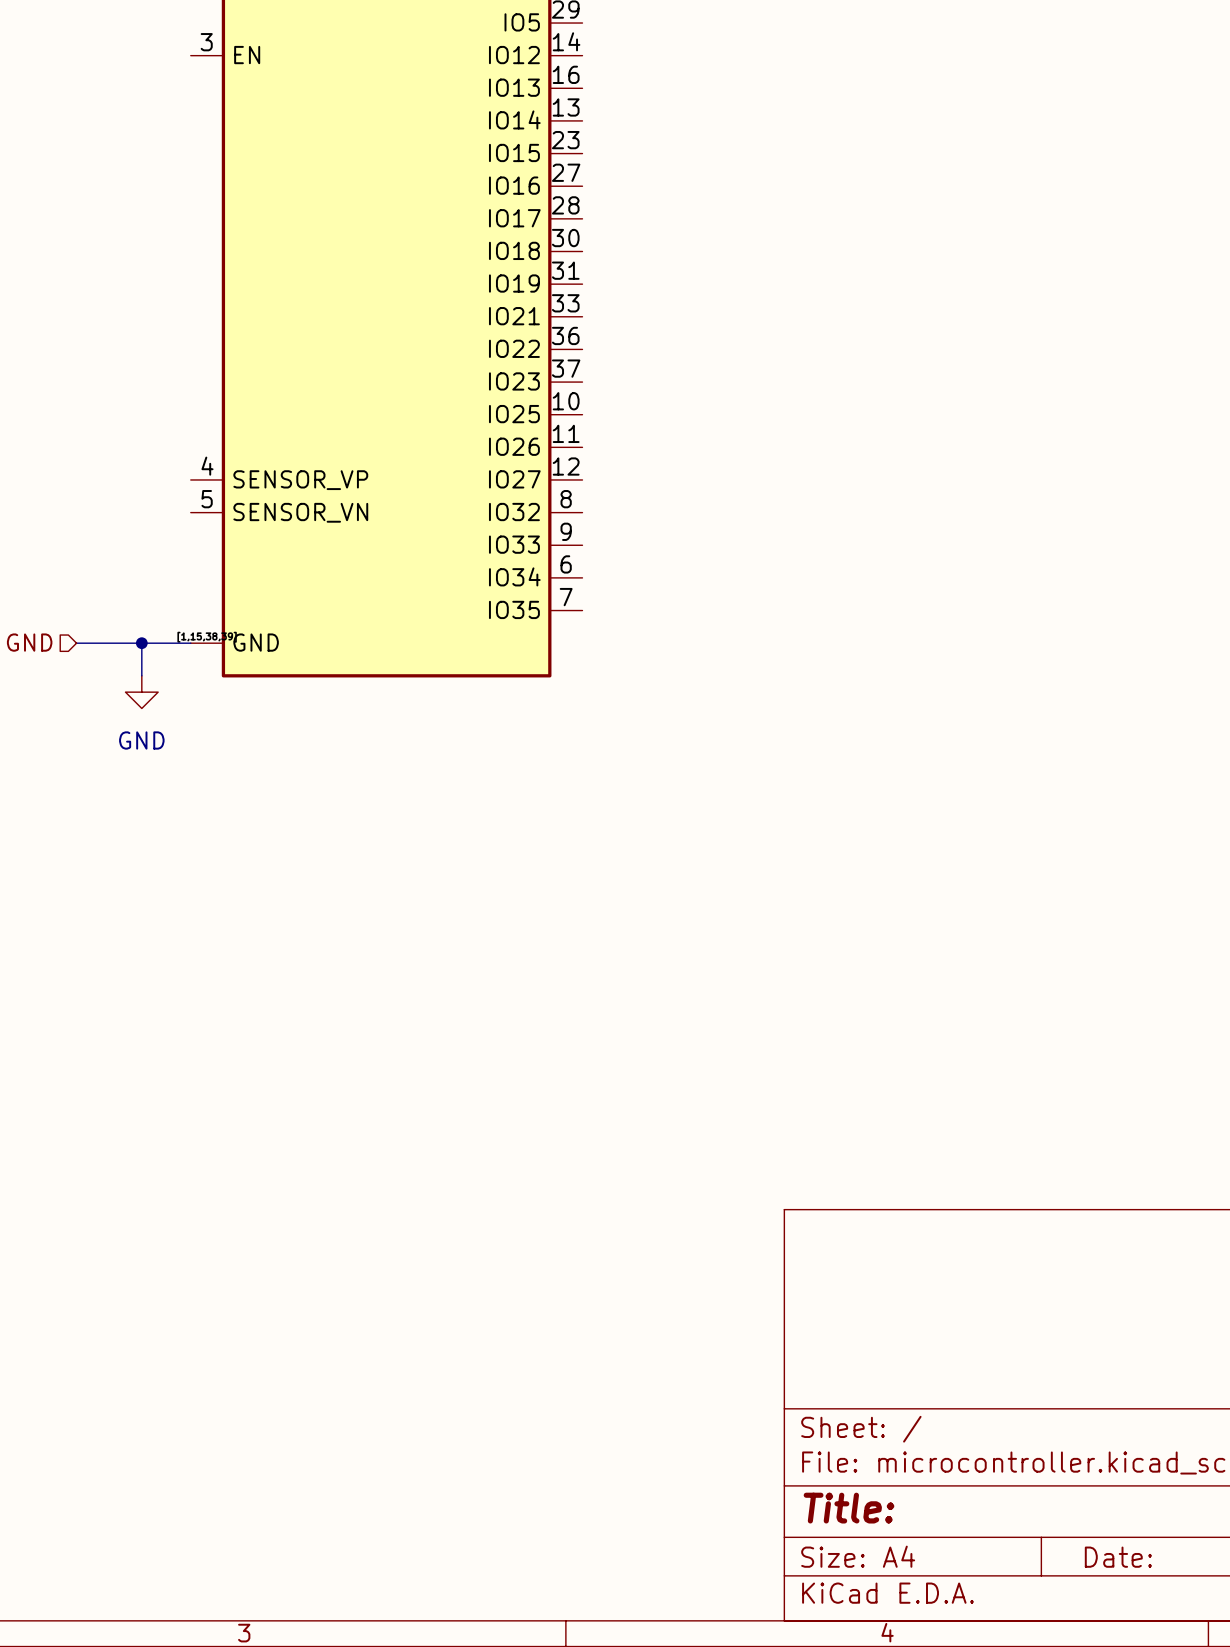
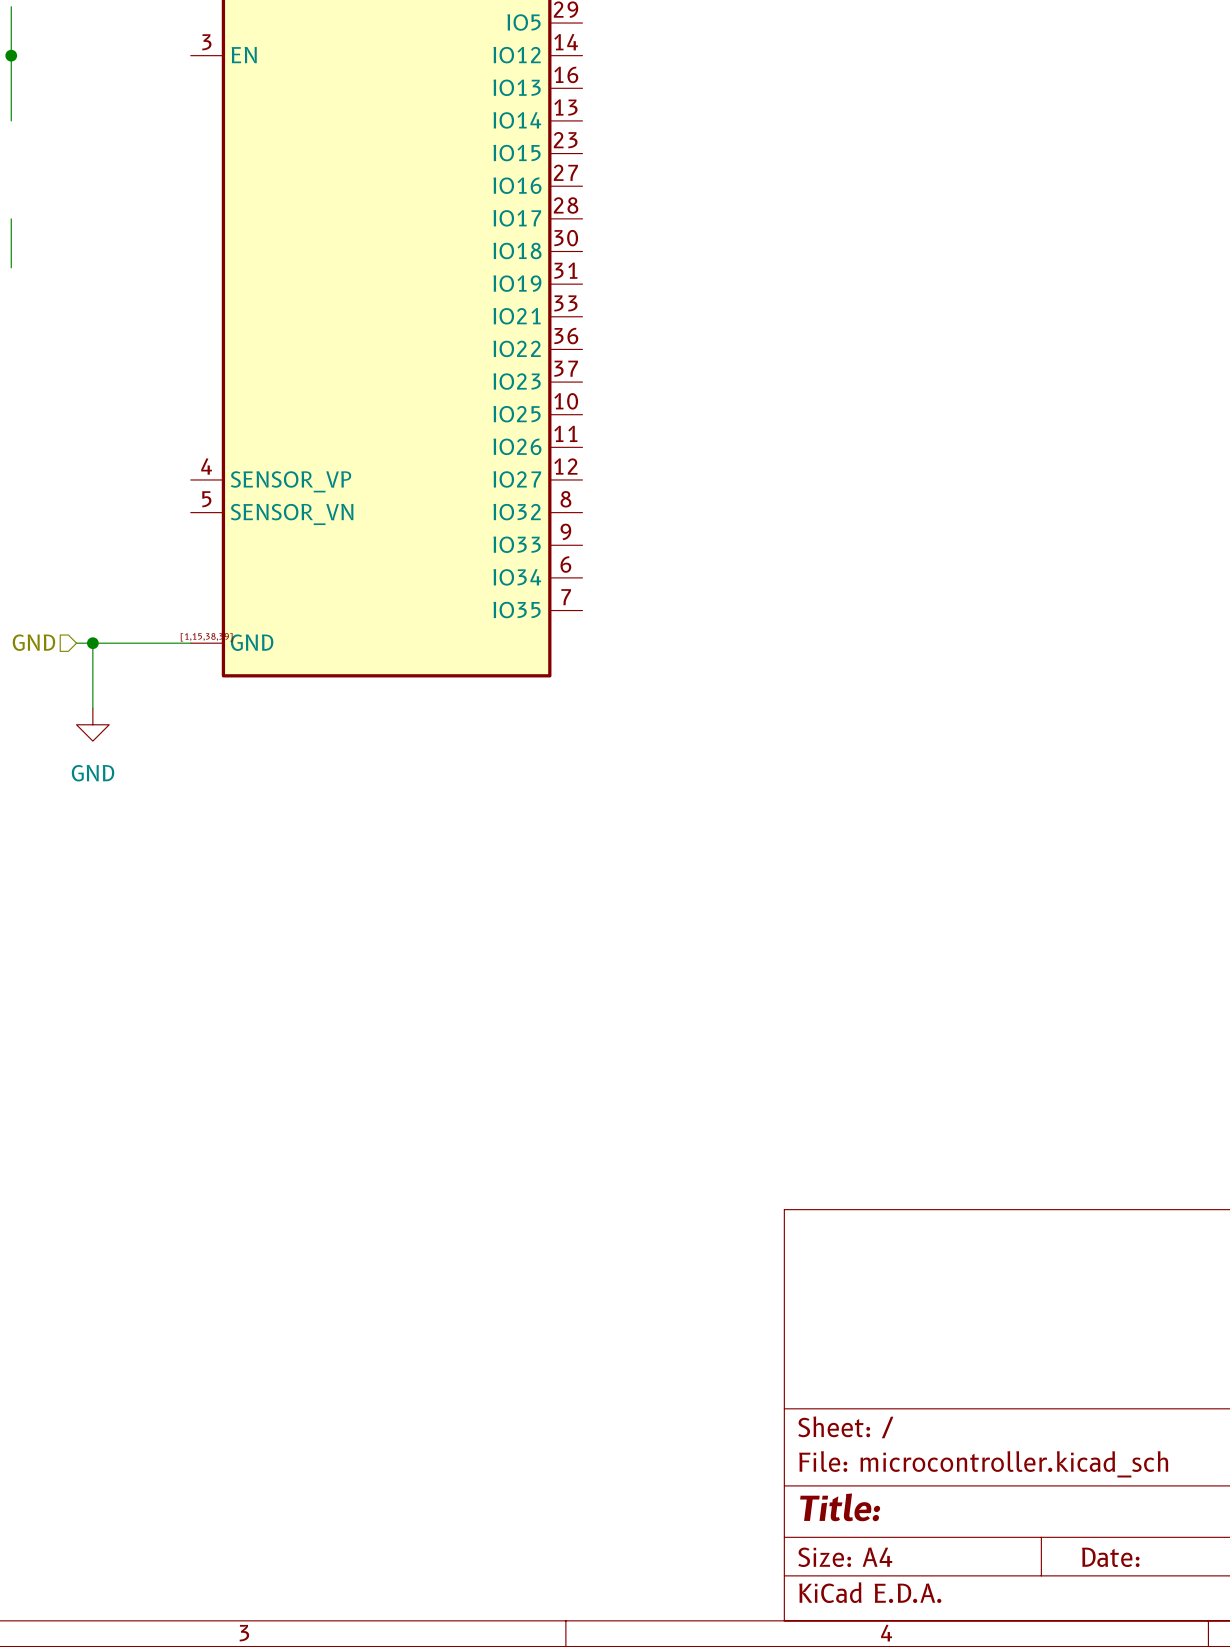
wire: none -> (11, 6) (11, 120)
junction: none -> (11, 55)
wire: none -> (11, 218) (11, 267)
wire: none -> (92, 643) (92, 708)
wire: (141, 643) (141, 675) -> none
junction position: (141, 643) -> (92, 643)
power symbol position: GND (141, 692) -> GND (92, 724)

